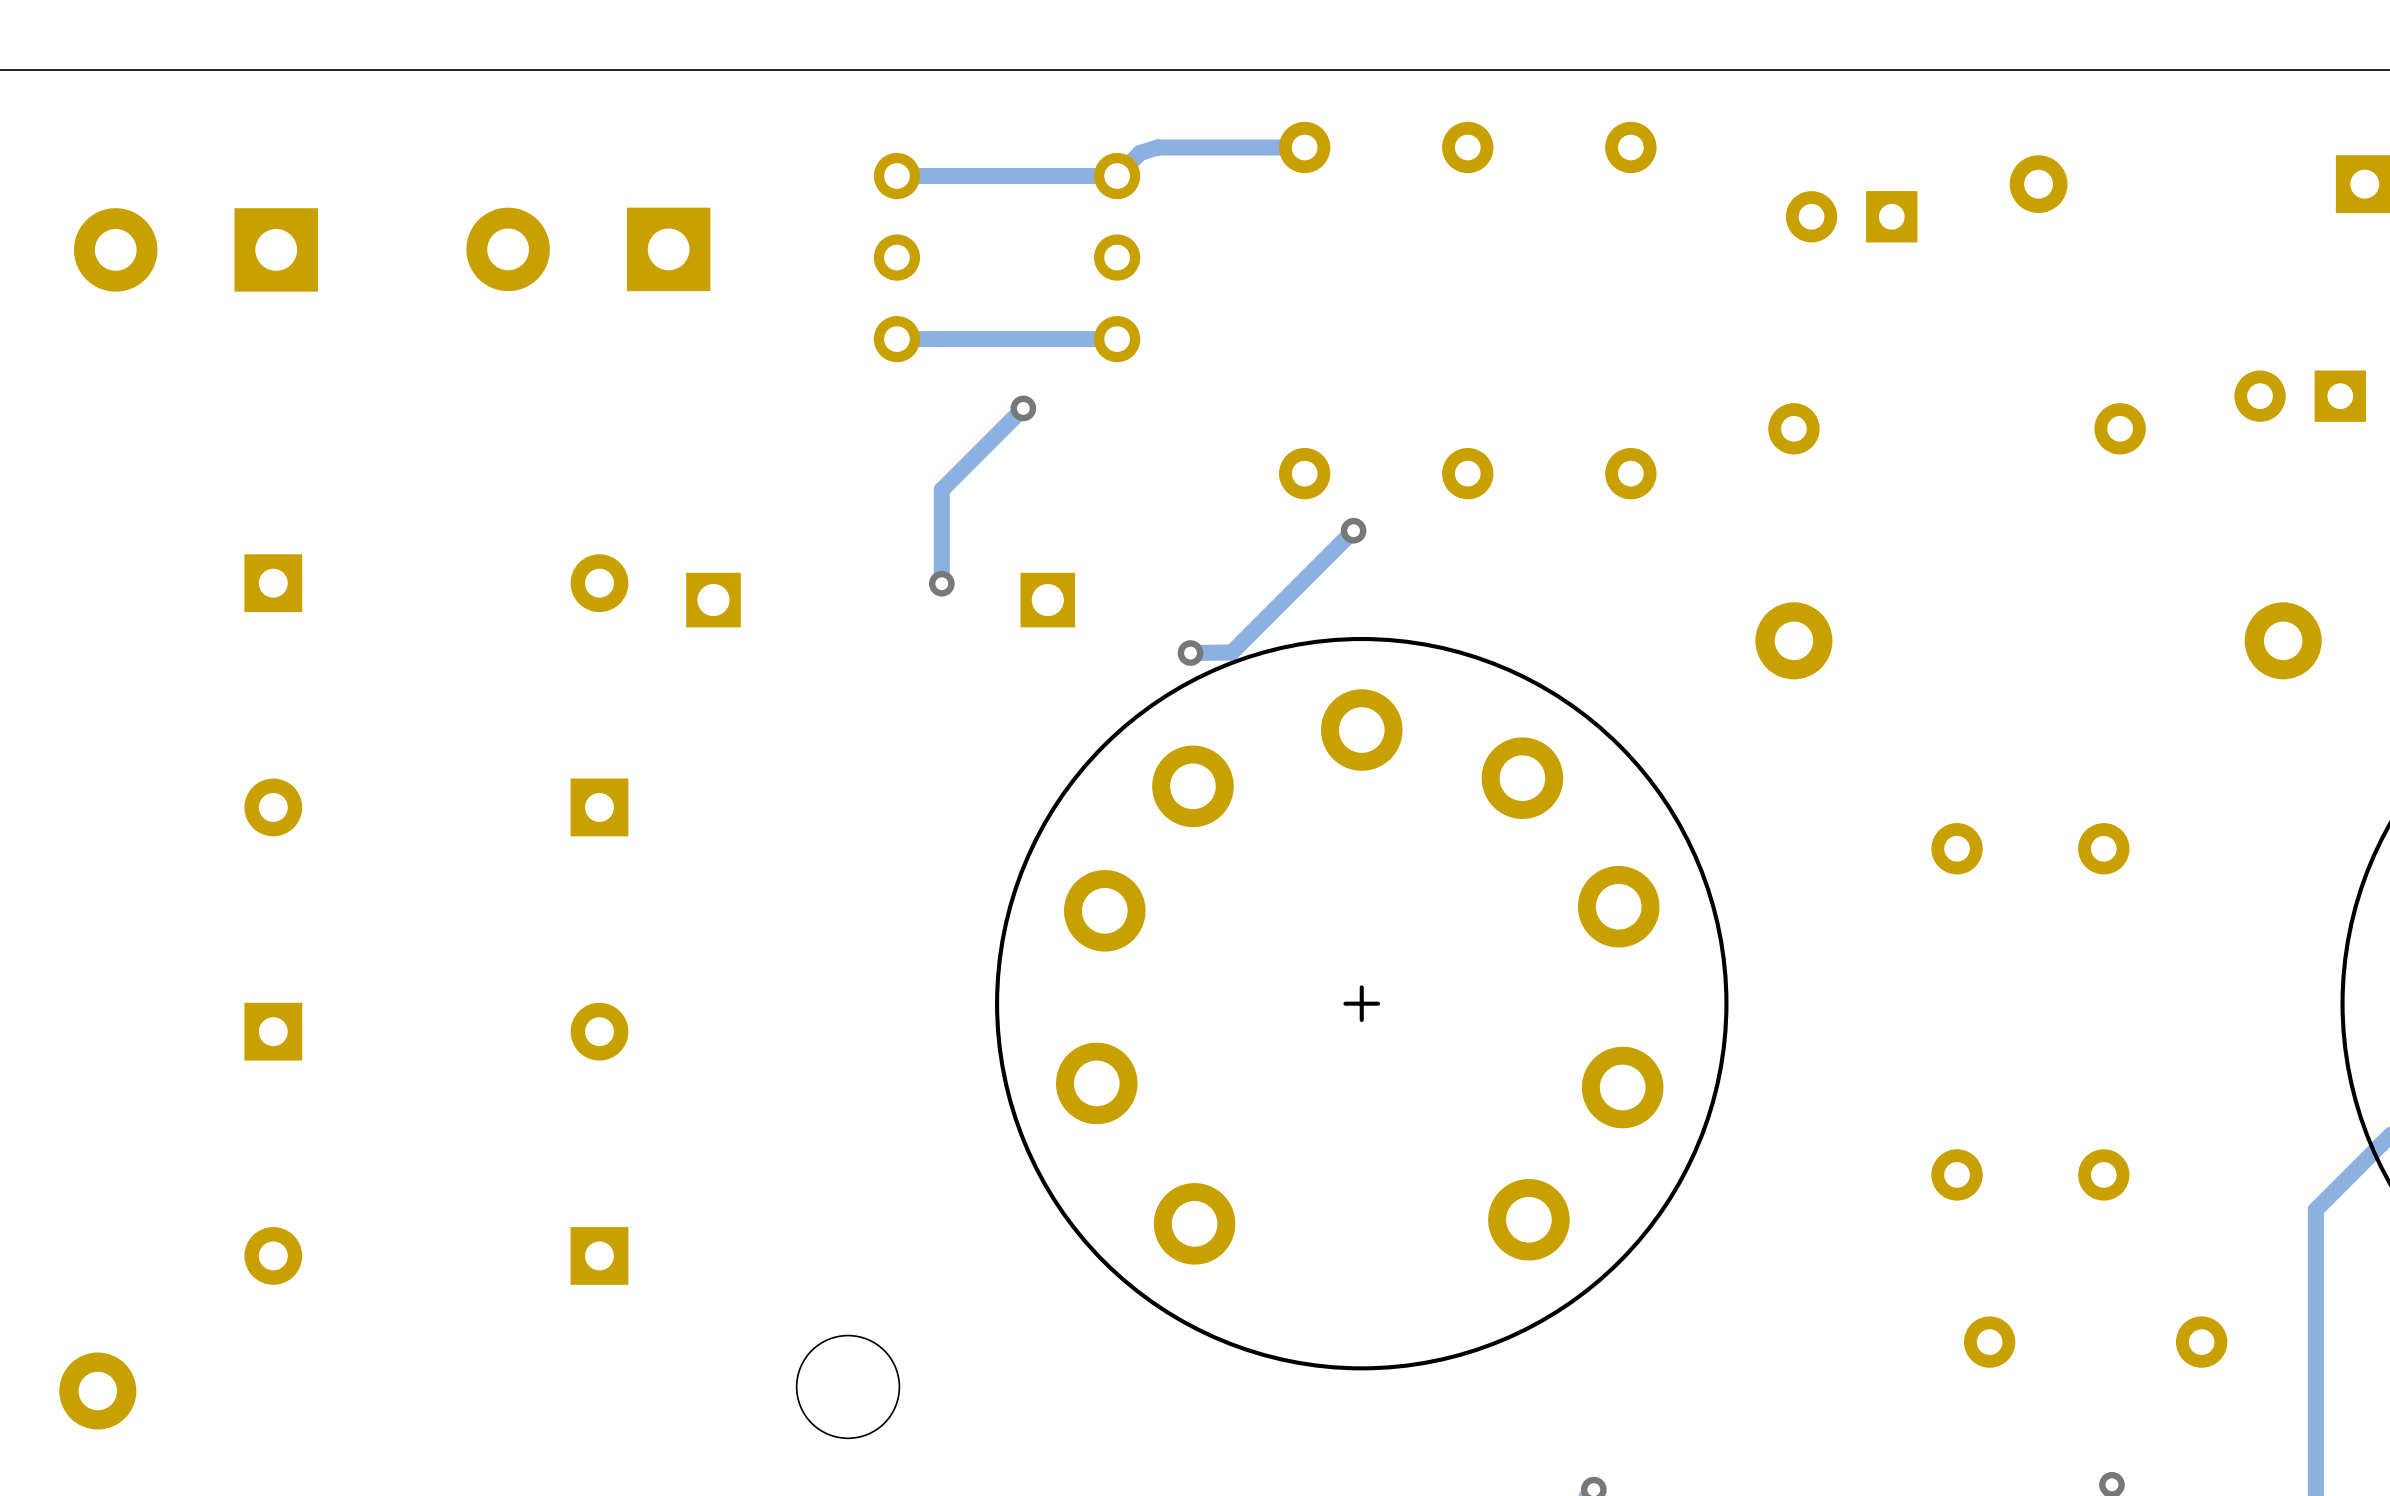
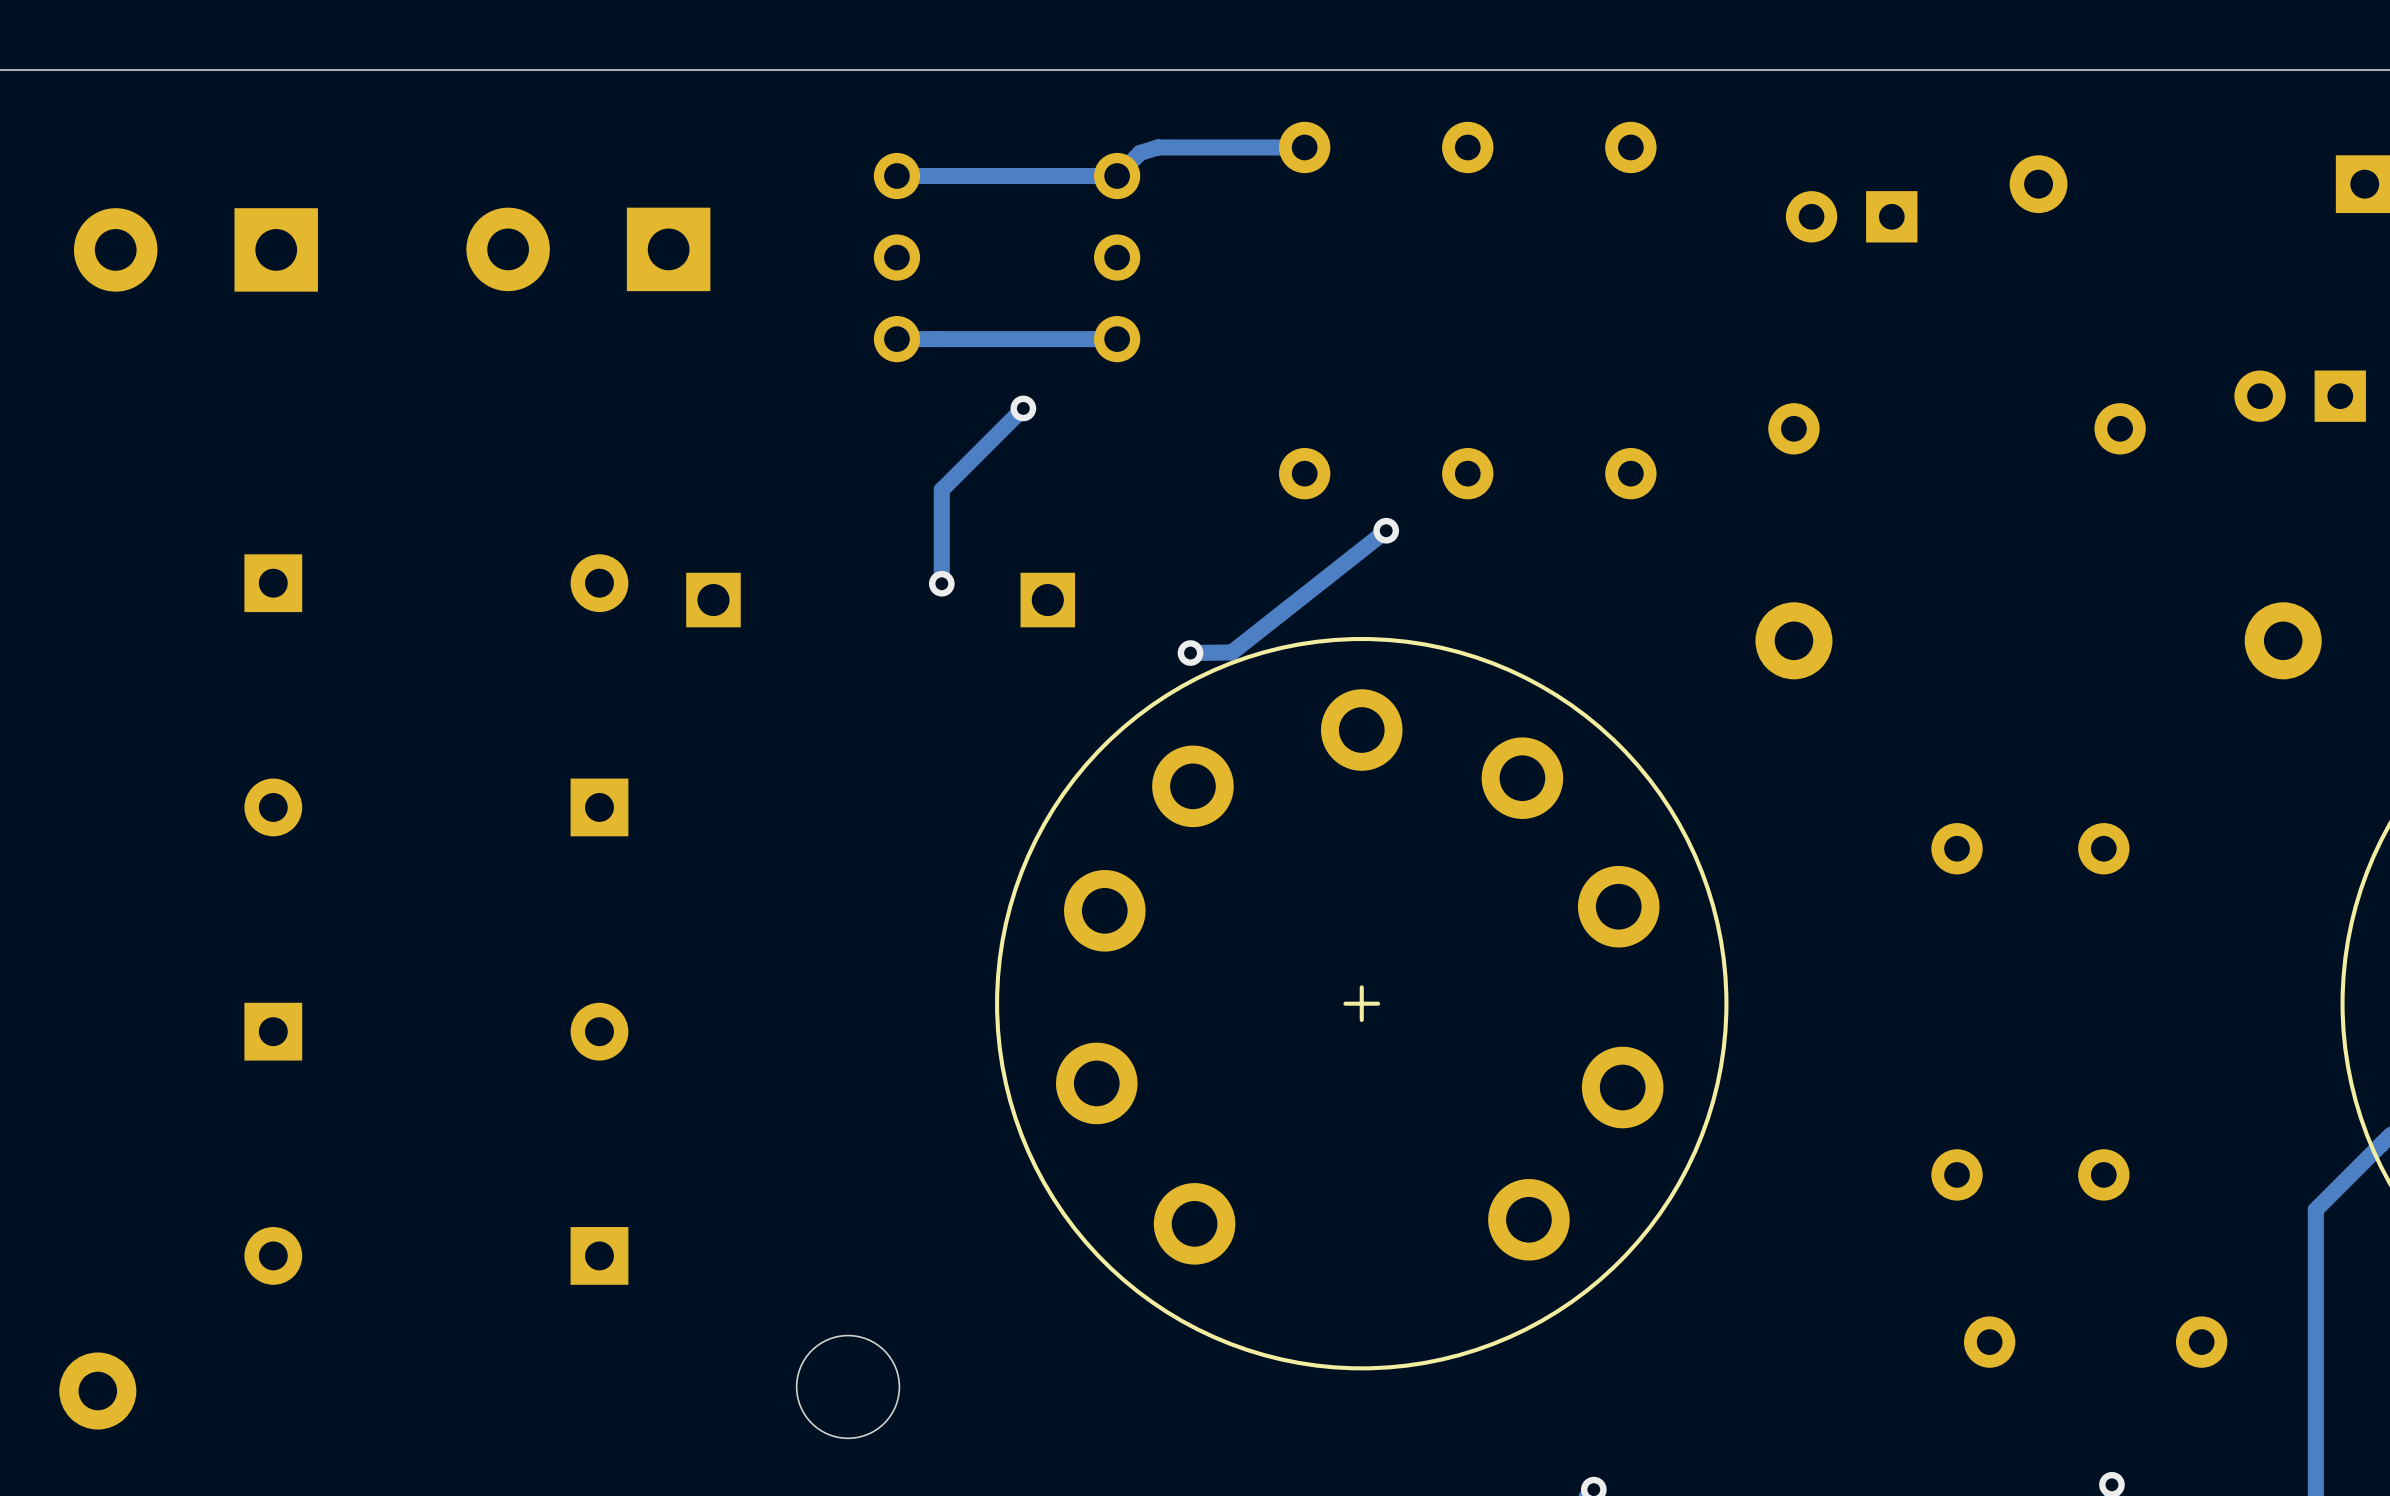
track: (1353, 530) (1231, 652) -> (1386, 530) (1231, 652)
via position: (1353, 530) -> (1386, 530)

